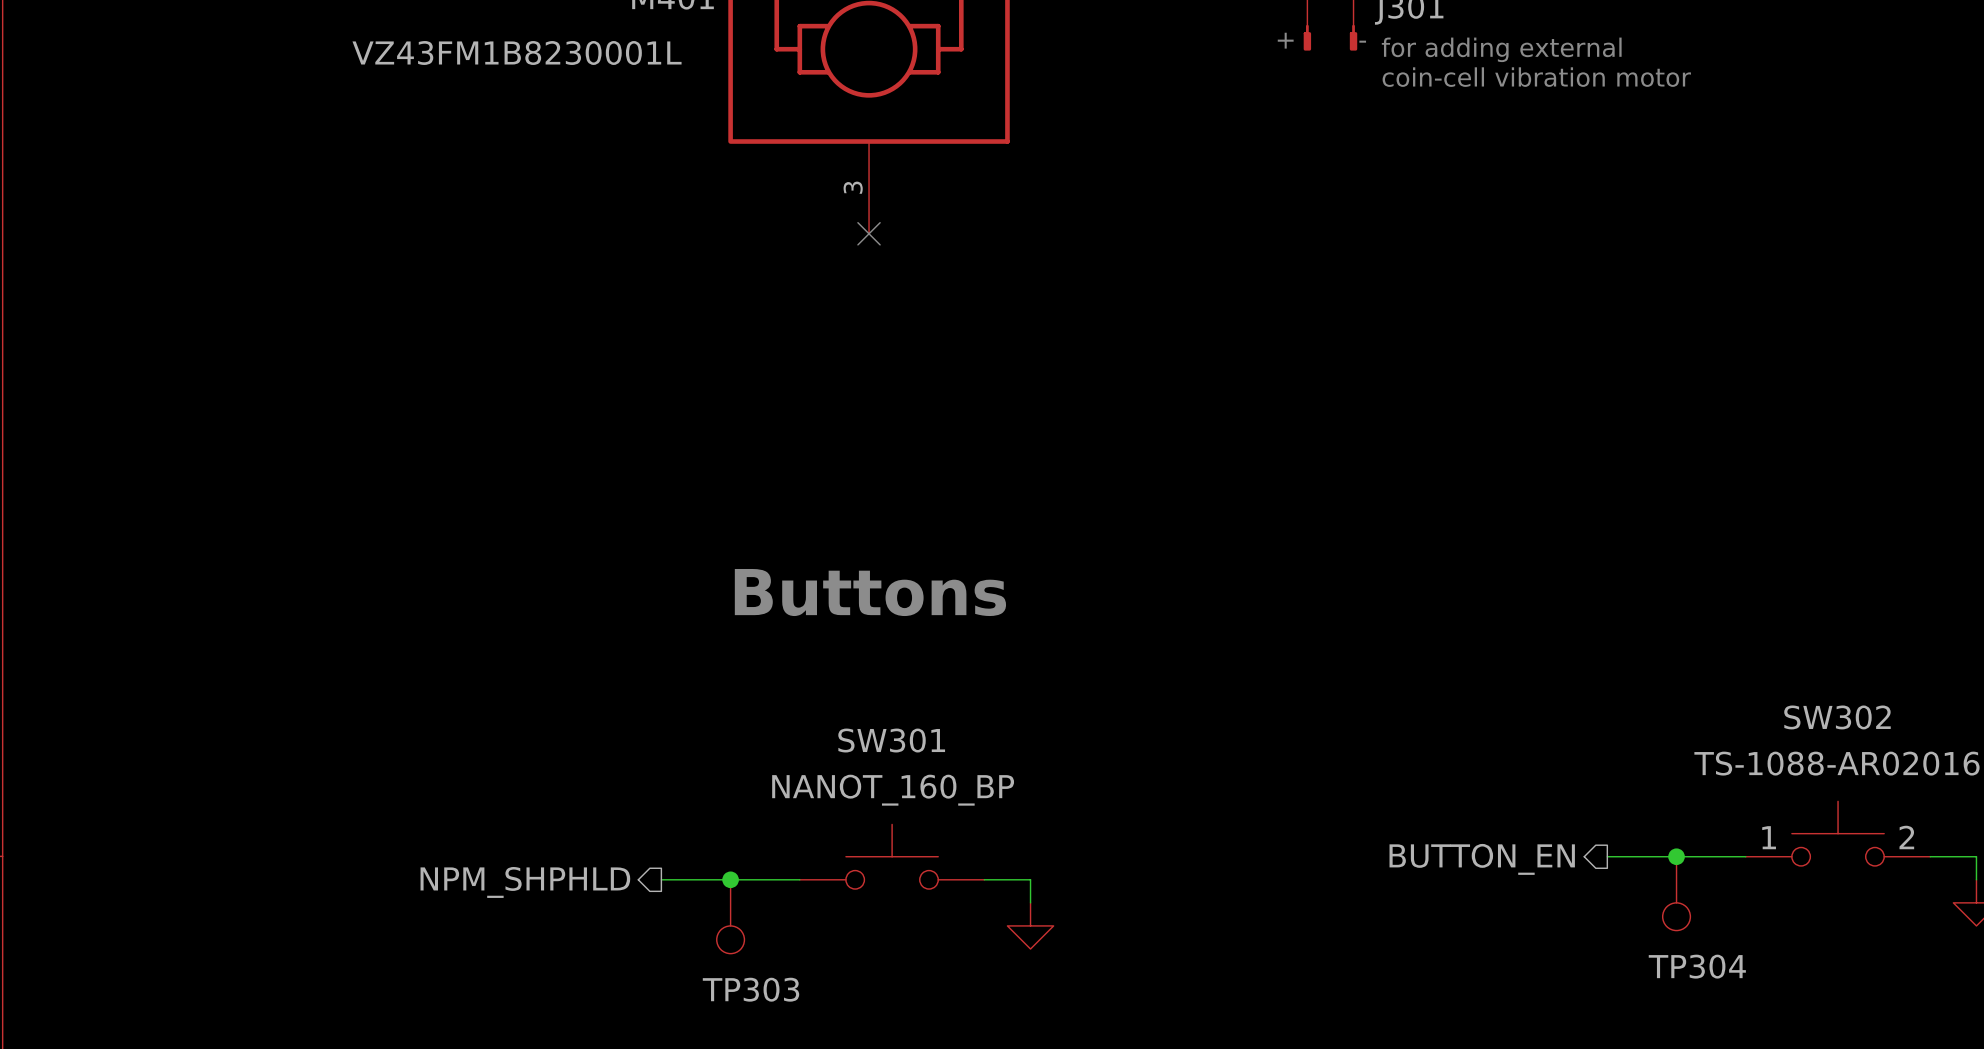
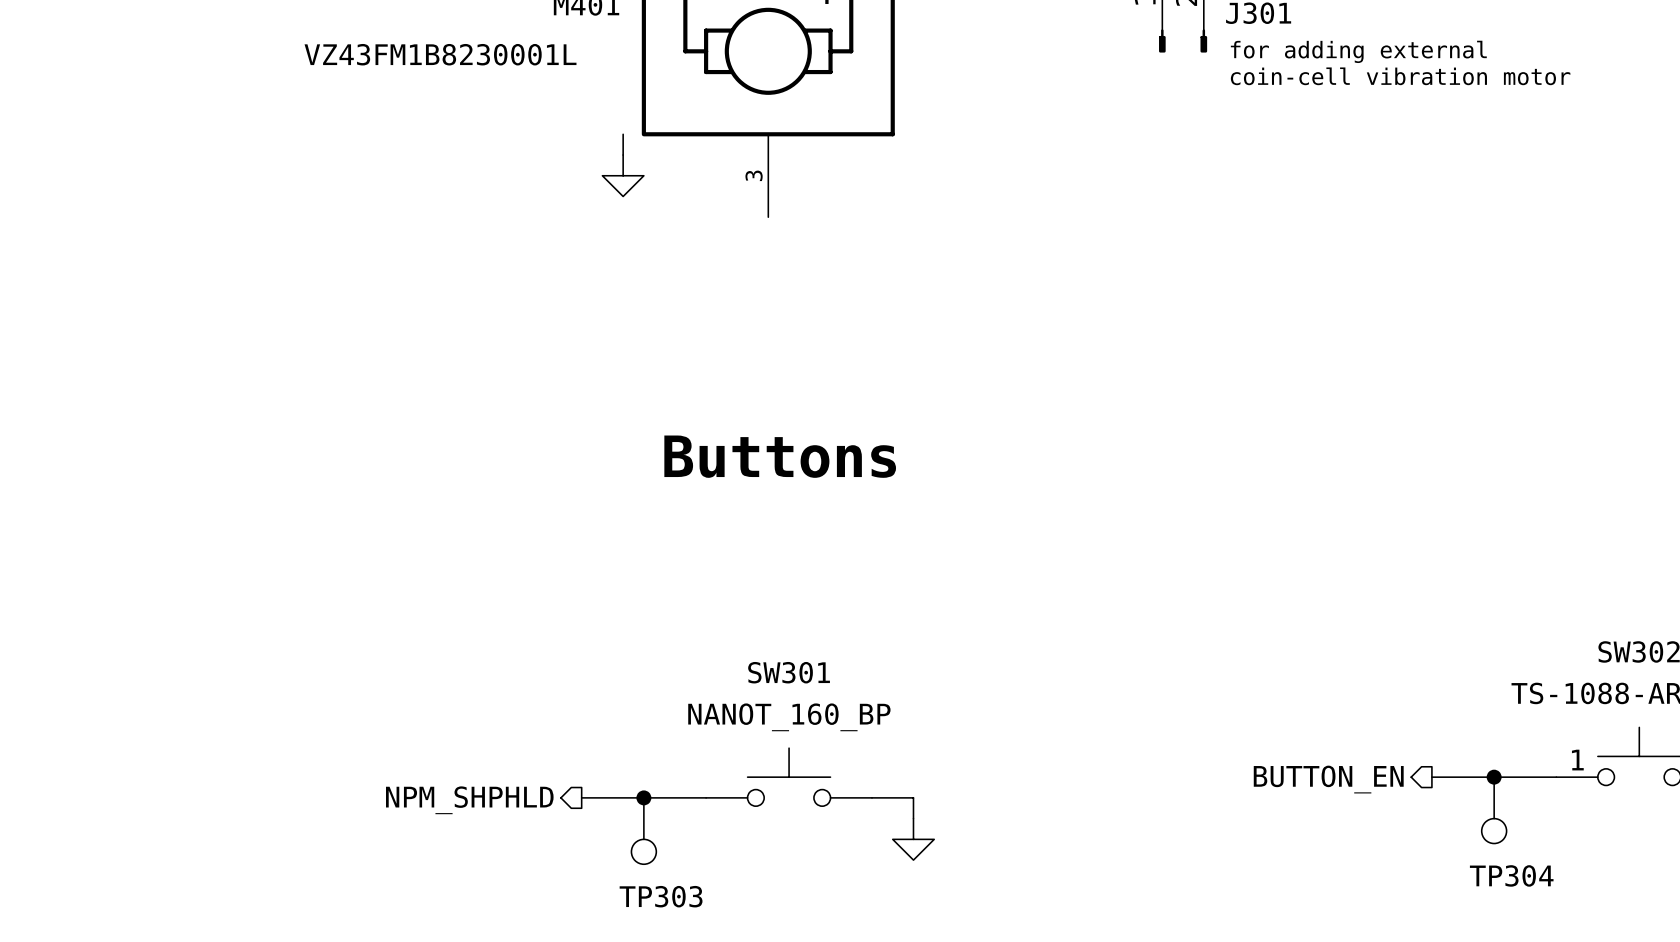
text: + (1285, 40) -> none
text: - (1362, 41) -> none
wire: none -> (623, 134) (623, 155)
power symbol: none -> (623, 175)
no-connect mark: (869, 233) -> none
text position: Buttons (870, 592) -> Buttons (780, 456)

